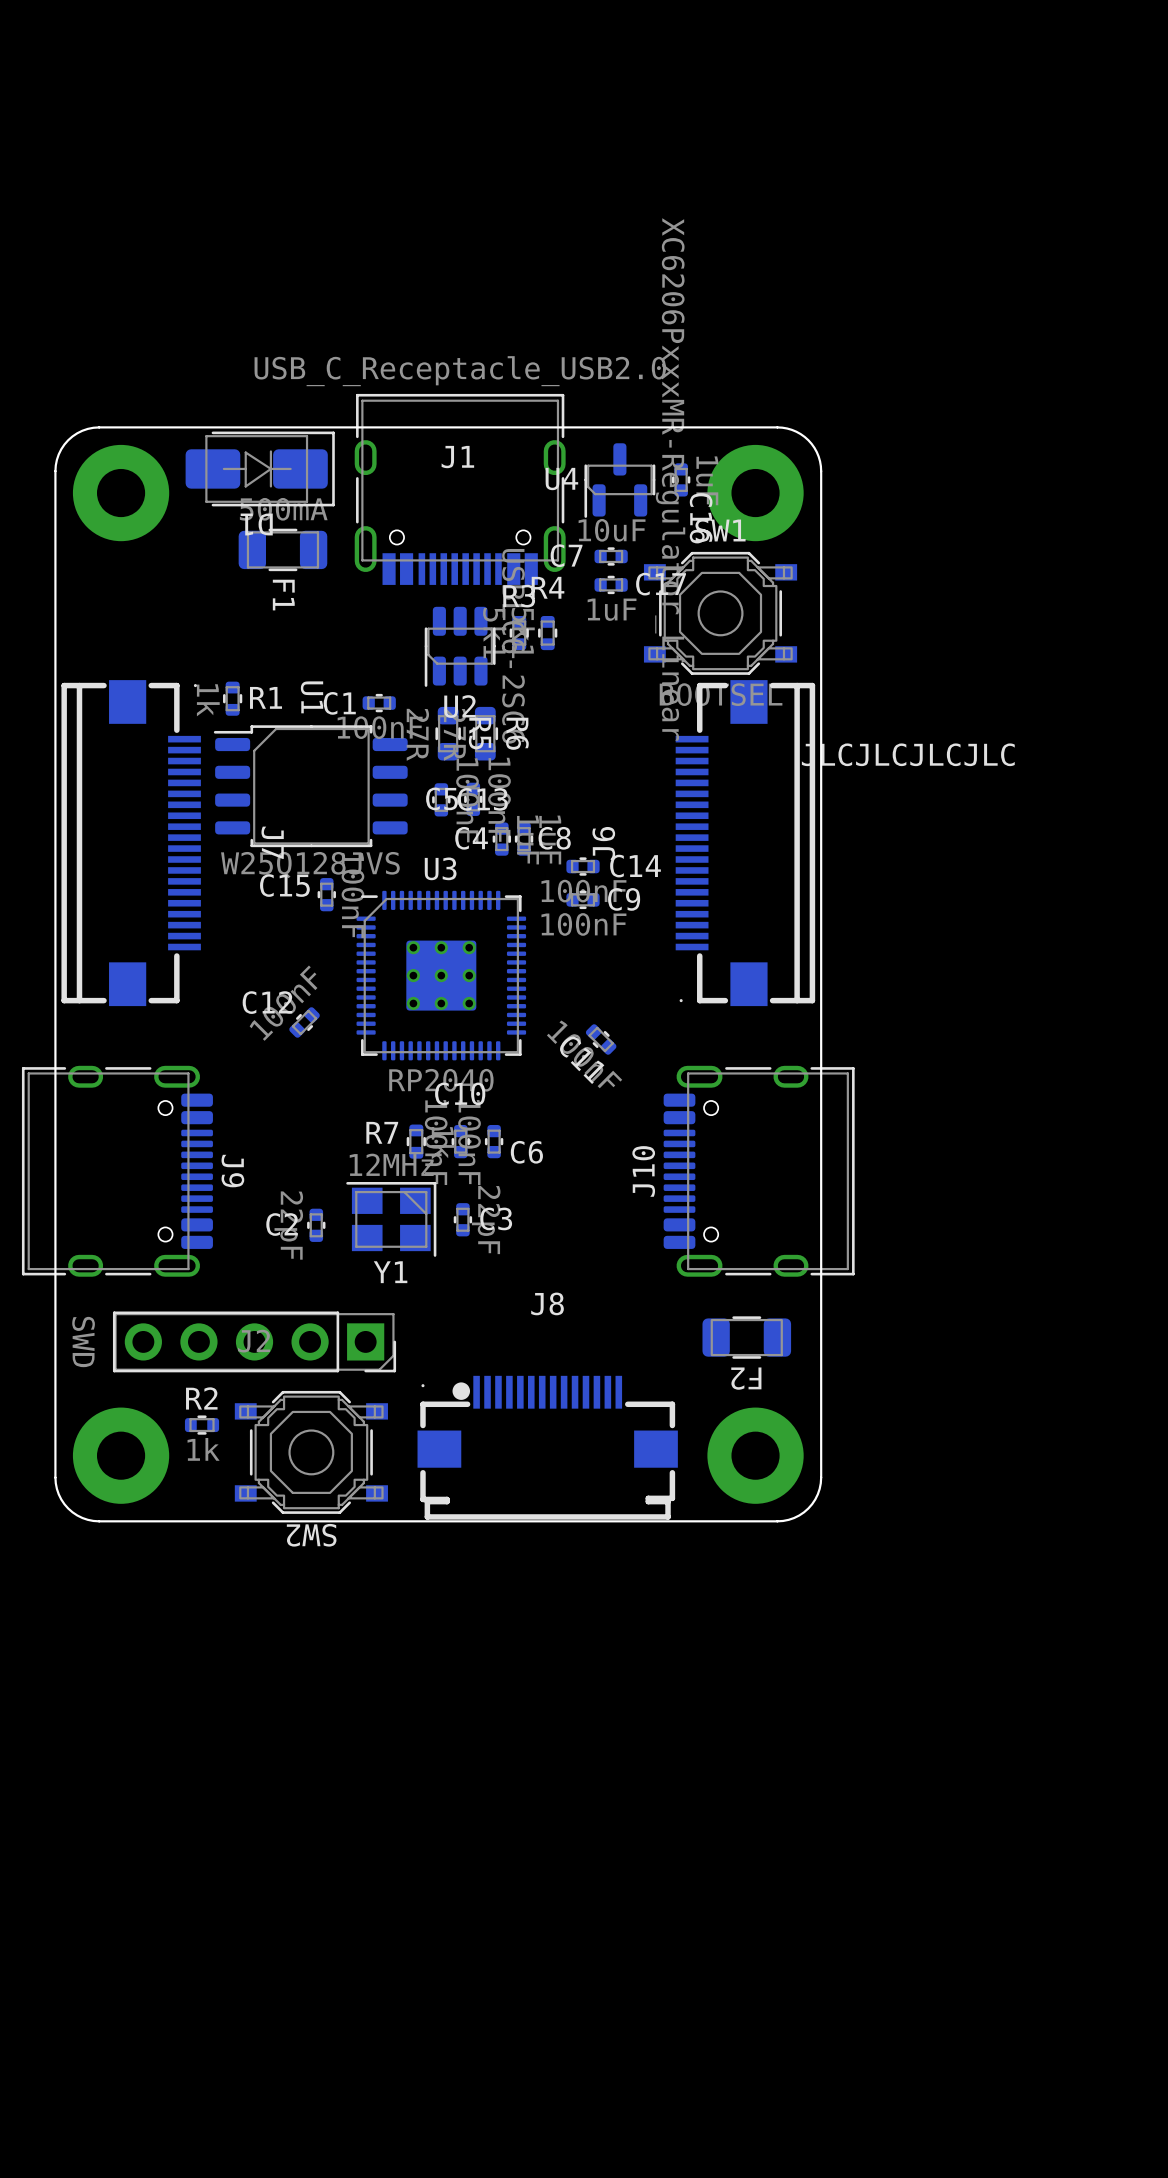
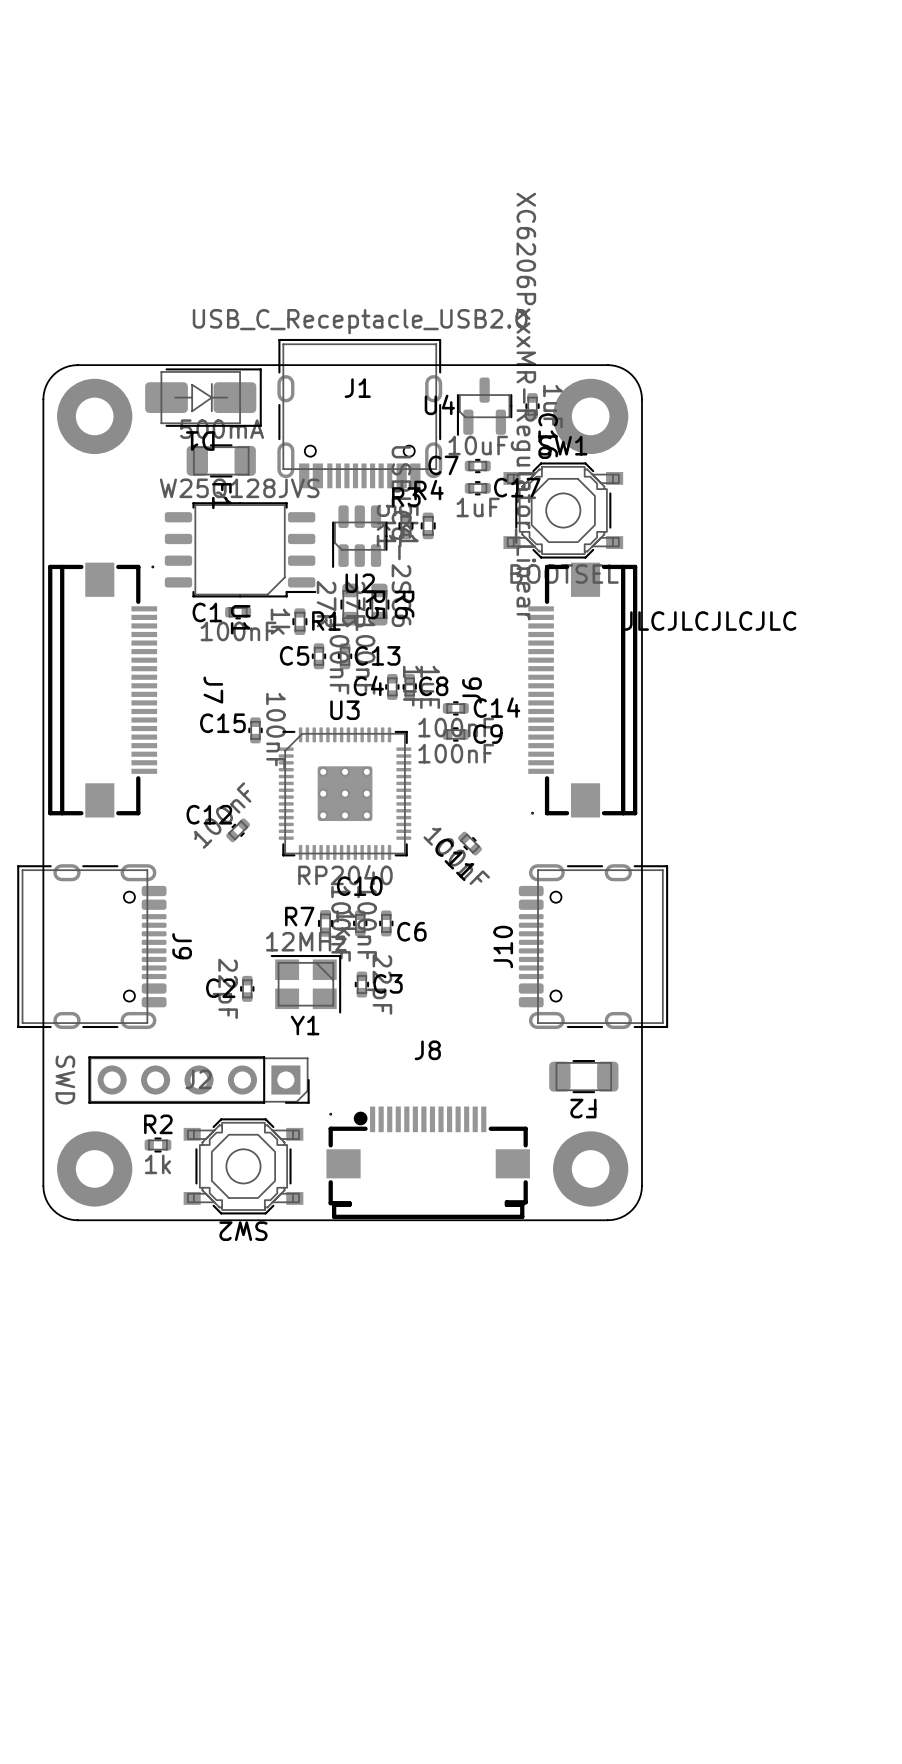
R1 position: (232, 698) -> (299, 621)
C1 position: (379, 703) -> (238, 612)
U1 rotation: 0° (310, 786) -> 180° (240, 549)
U1 position: (310, 786) -> (240, 549)
C5 position: (473, 799) -> (318, 656)

